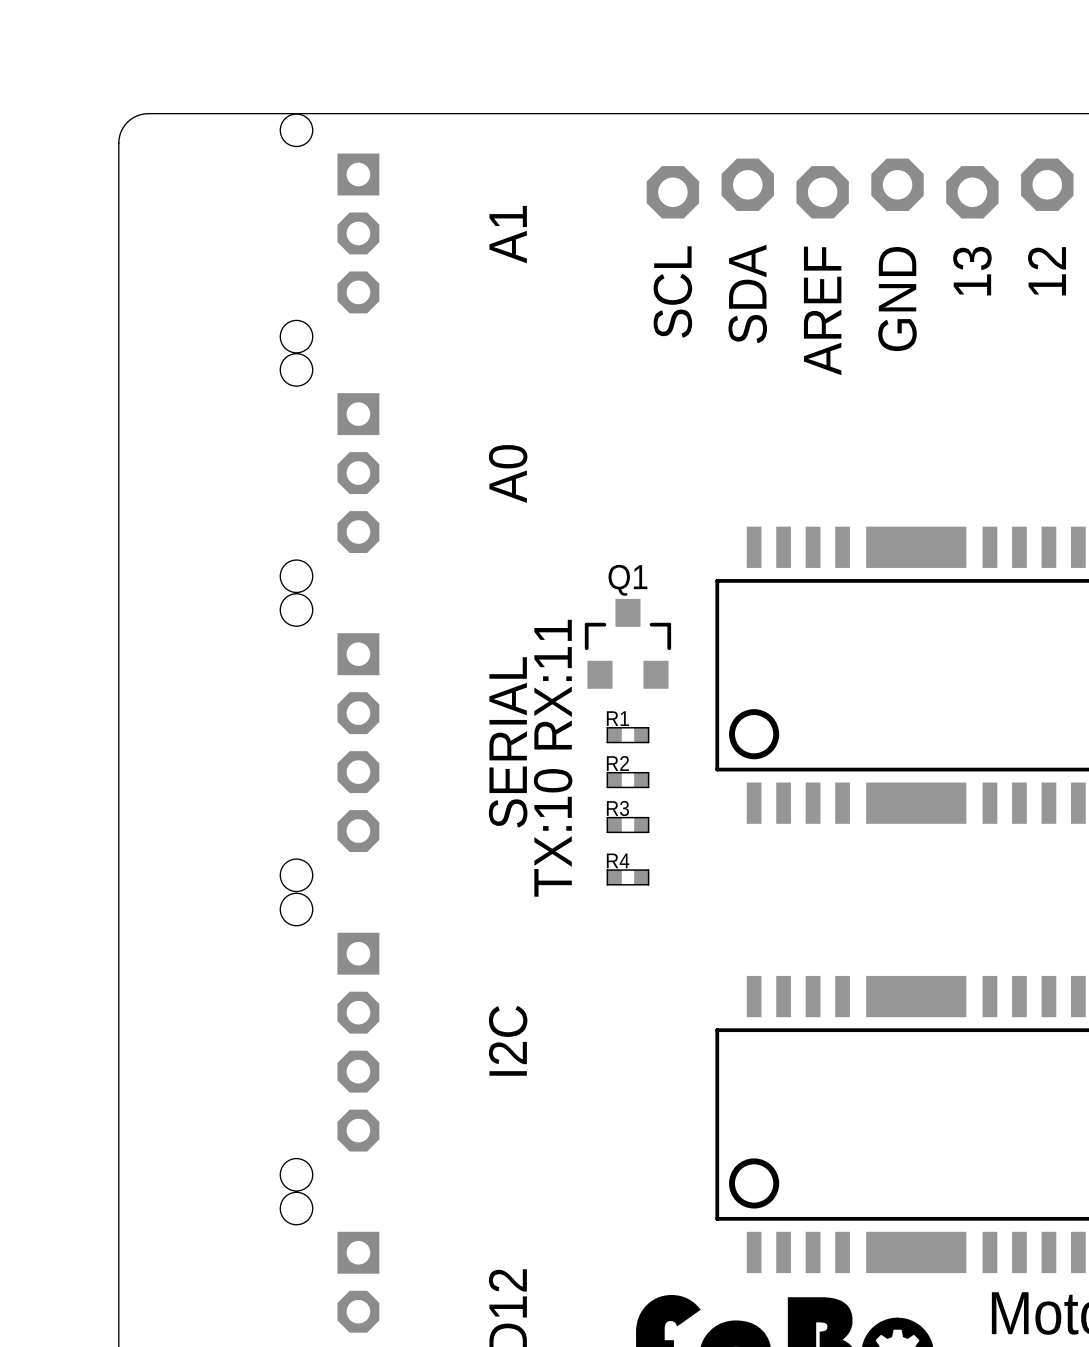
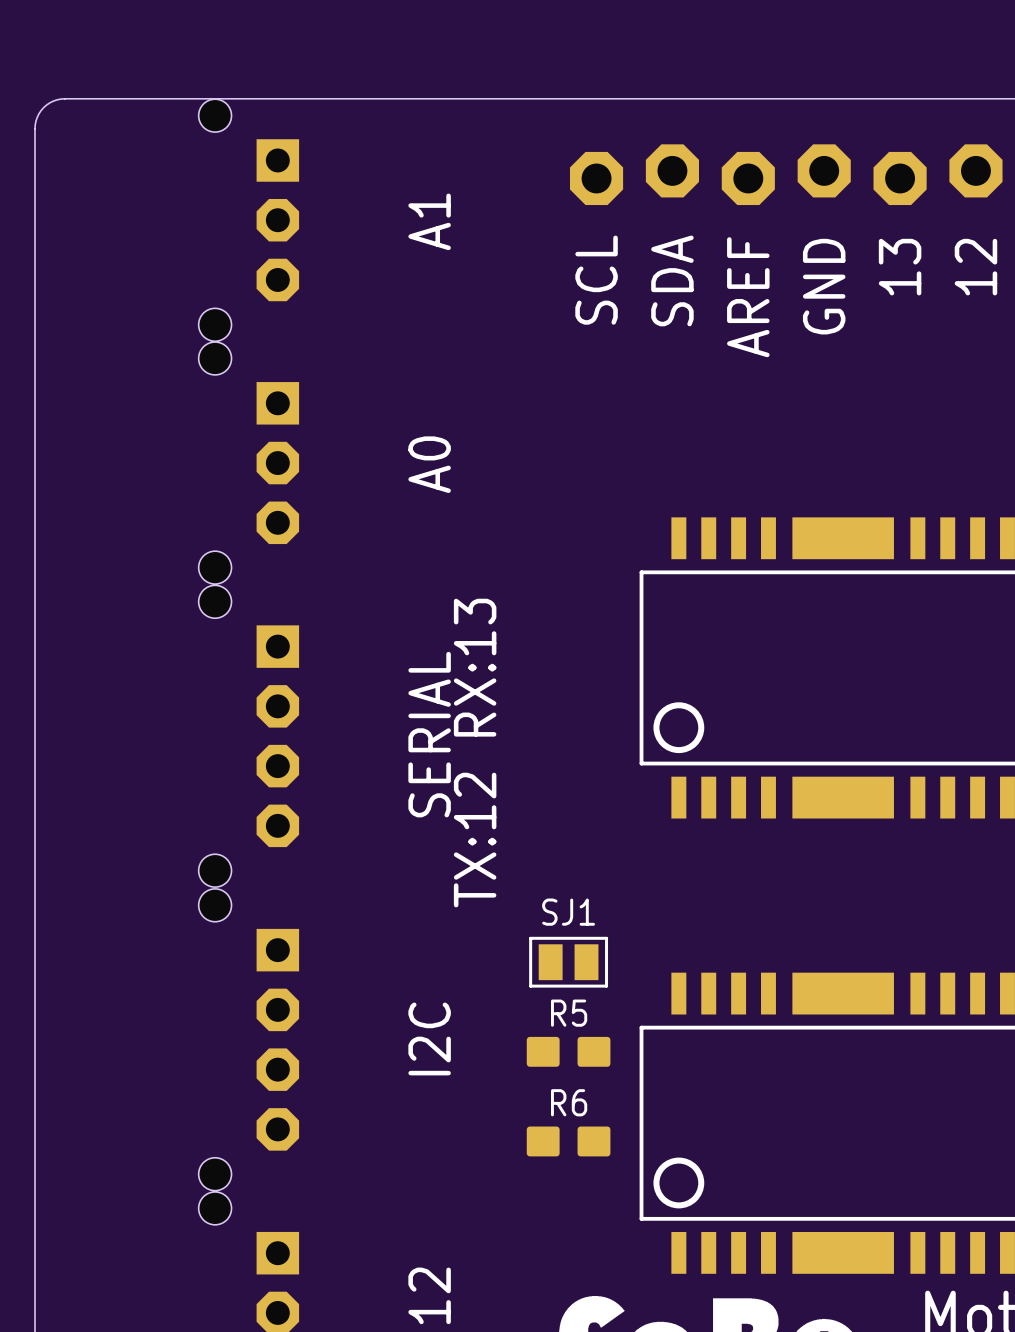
Q1: (627, 643) -> none
R1: (627, 735) -> none
text: TX:10 RX:11 (553, 758) -> TX:12 RX:13 (475, 753)
R2: (627, 780) -> none
R3: (627, 825) -> none
R4: (627, 877) -> none
SJ1: none -> (568, 962)
R5: none -> (568, 1051)
R6: none -> (568, 1141)

